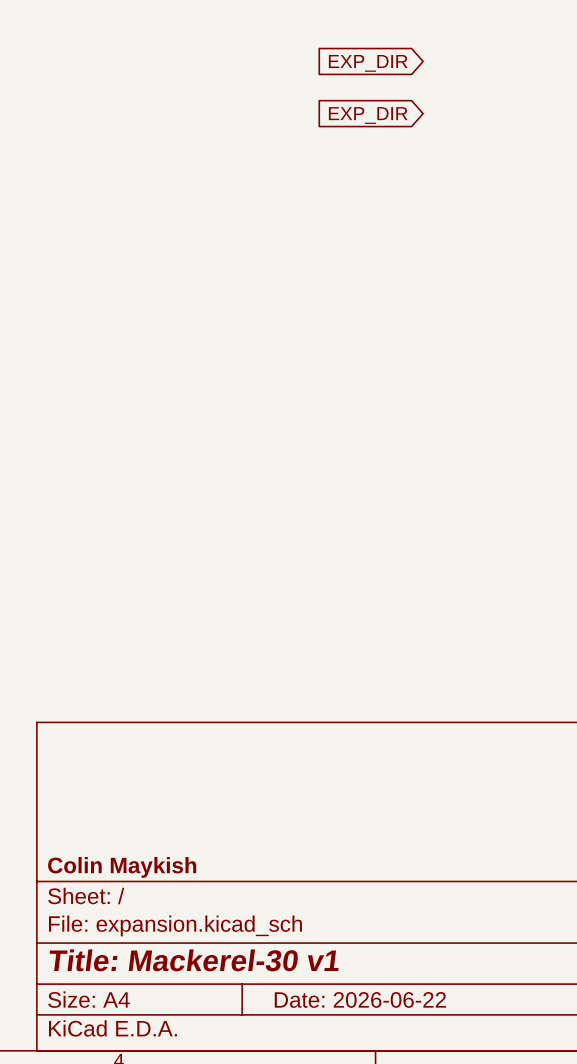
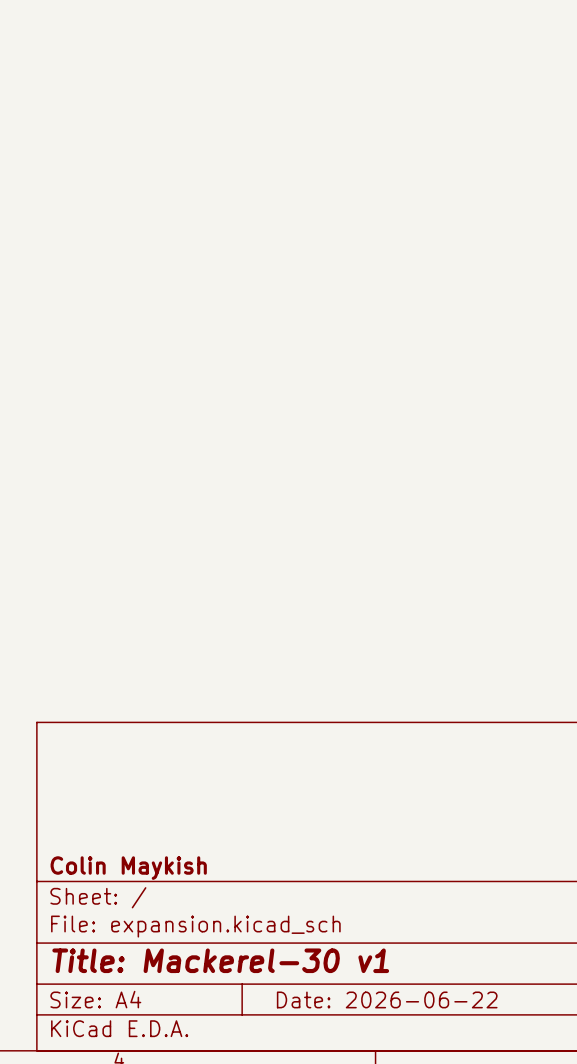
global label: EXP_DIR (368, 63) -> none
global label: EXP_DIR (368, 115) -> none

